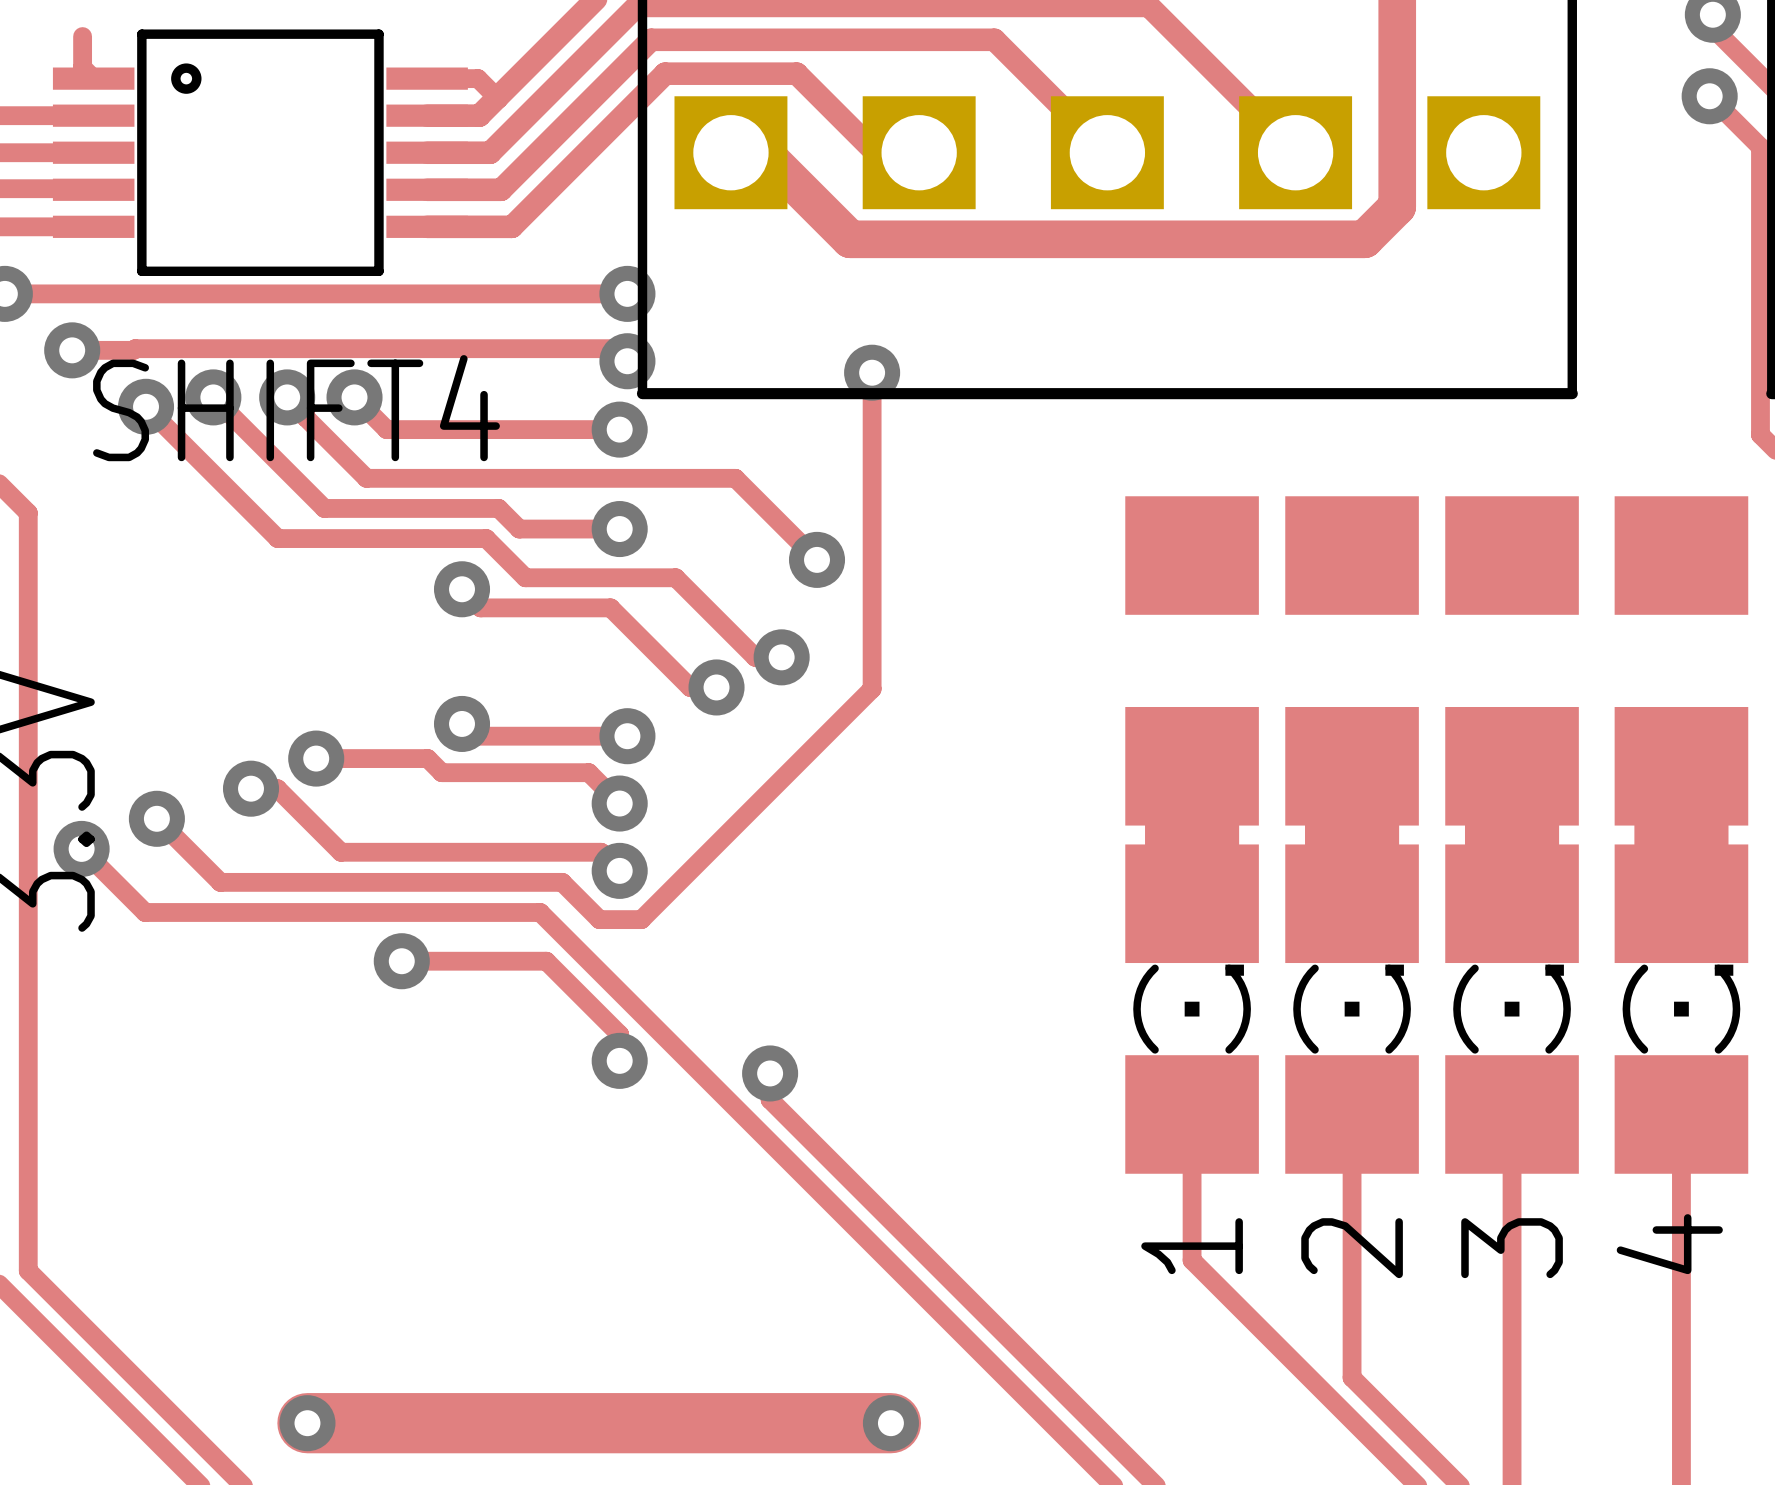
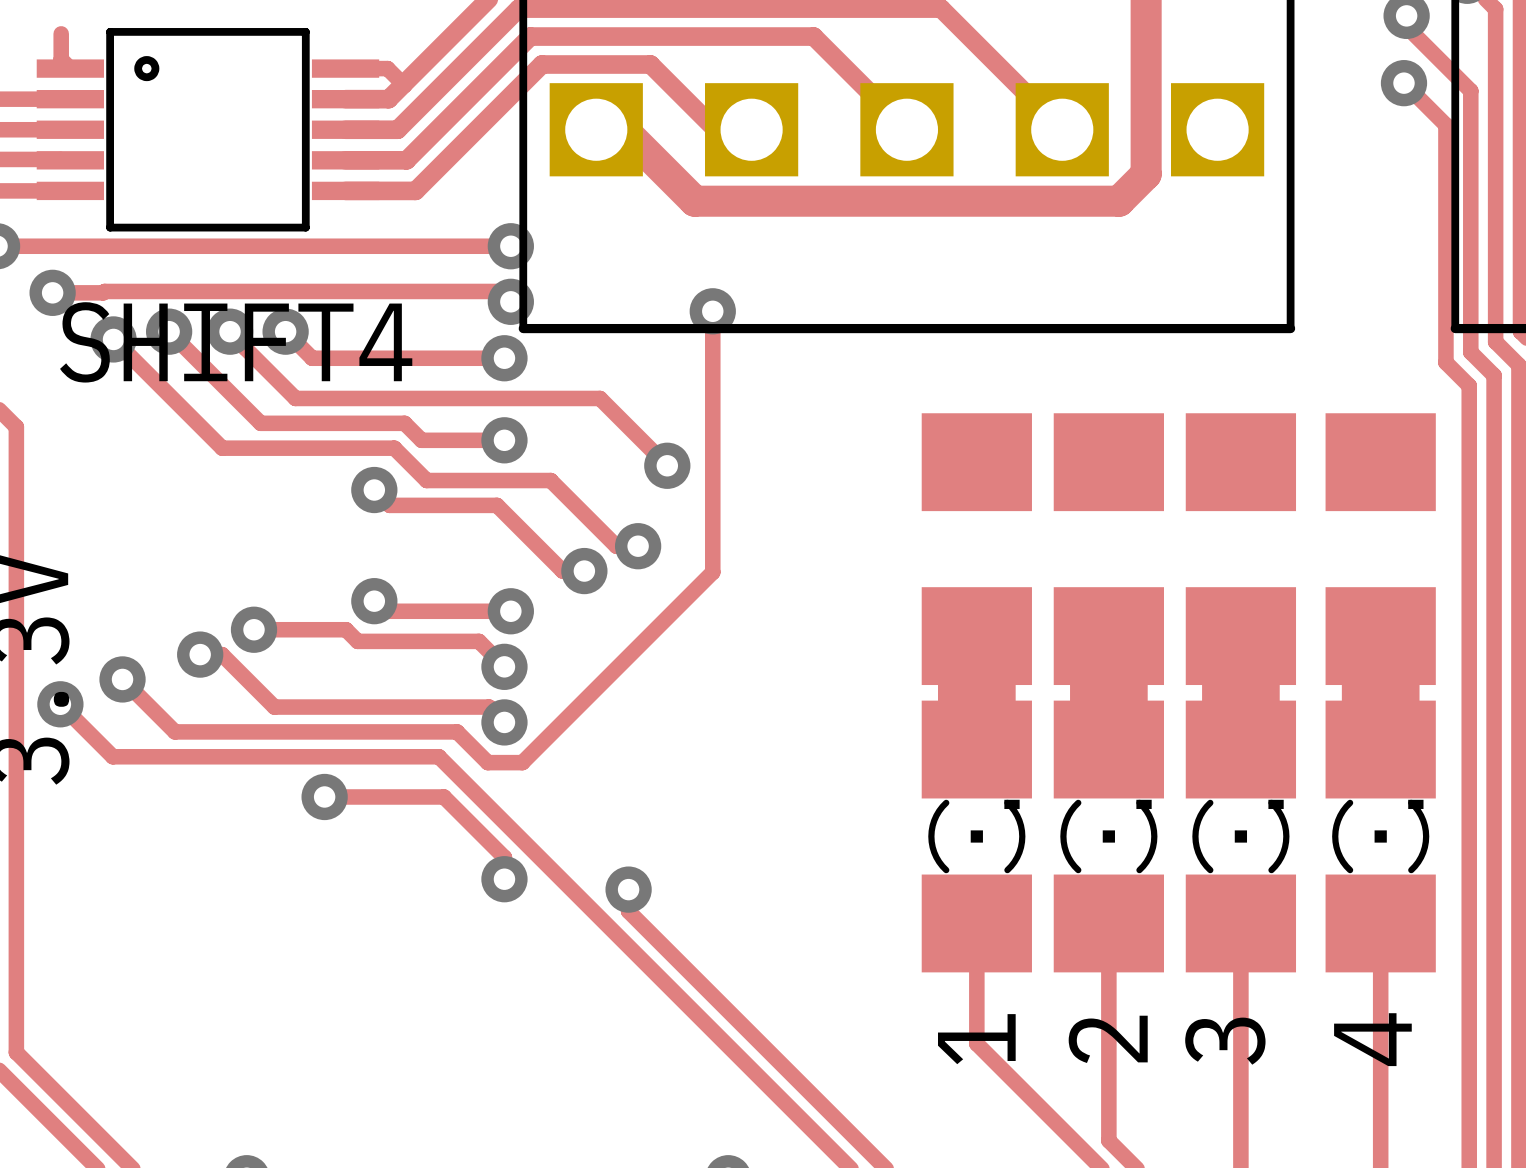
3 name position: 3 (1512, 1248) -> 3 (1225, 1041)

